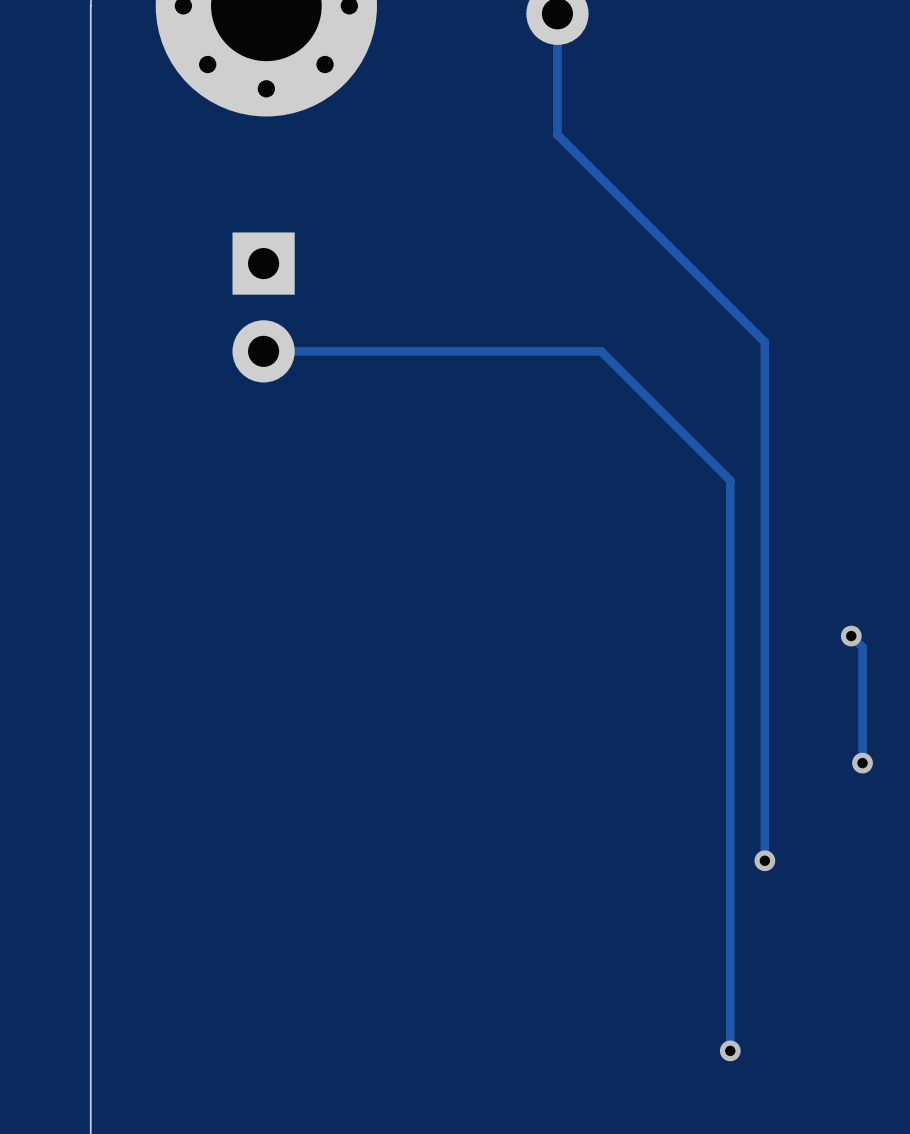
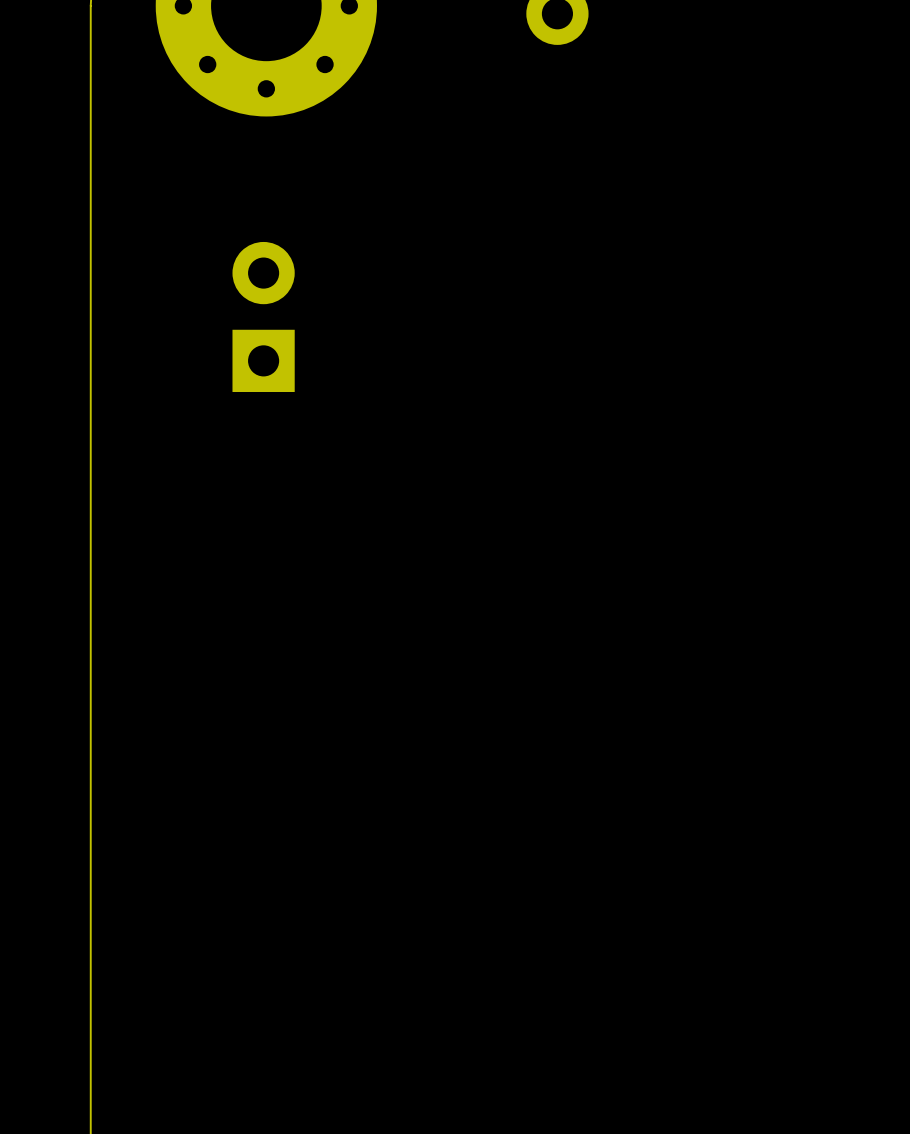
track: (557, 13) (557, 134) (764, 342) (764, 860) -> none
part rotation: 0° (263, 307) -> 180° (263, 316)
track: (263, 351) (601, 351) (730, 480) (730, 1050) -> none
track: (851, 636) (862, 647) (862, 763) -> none
via: (851, 636) -> none
via: (862, 763) -> none
via: (764, 860) -> none
via: (730, 1050) -> none

